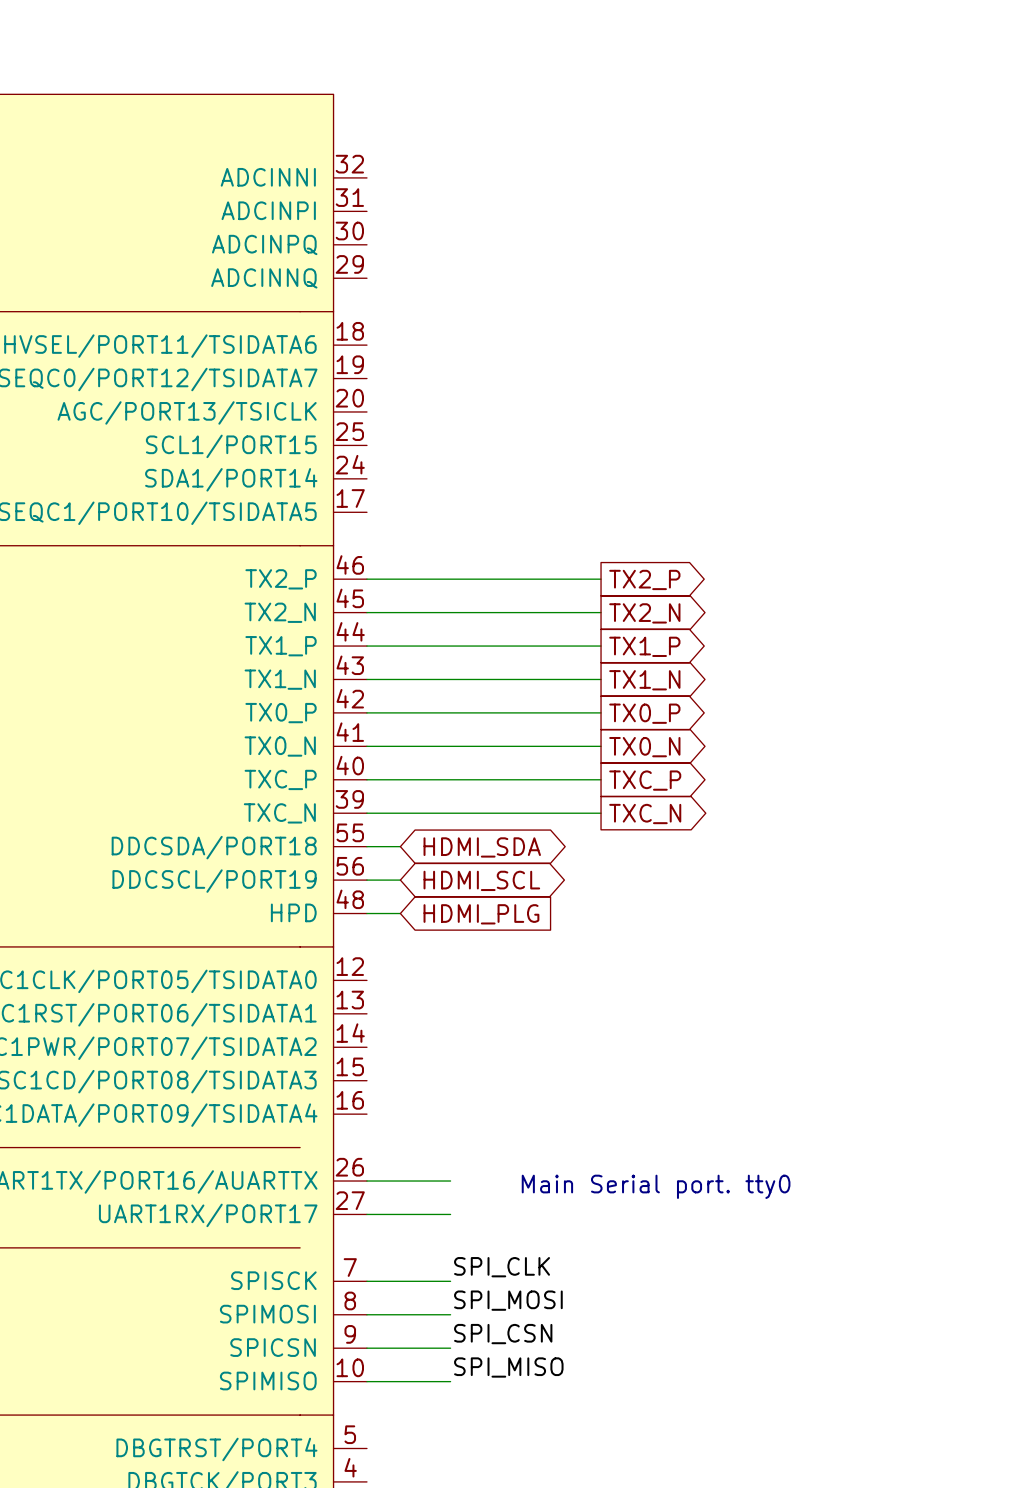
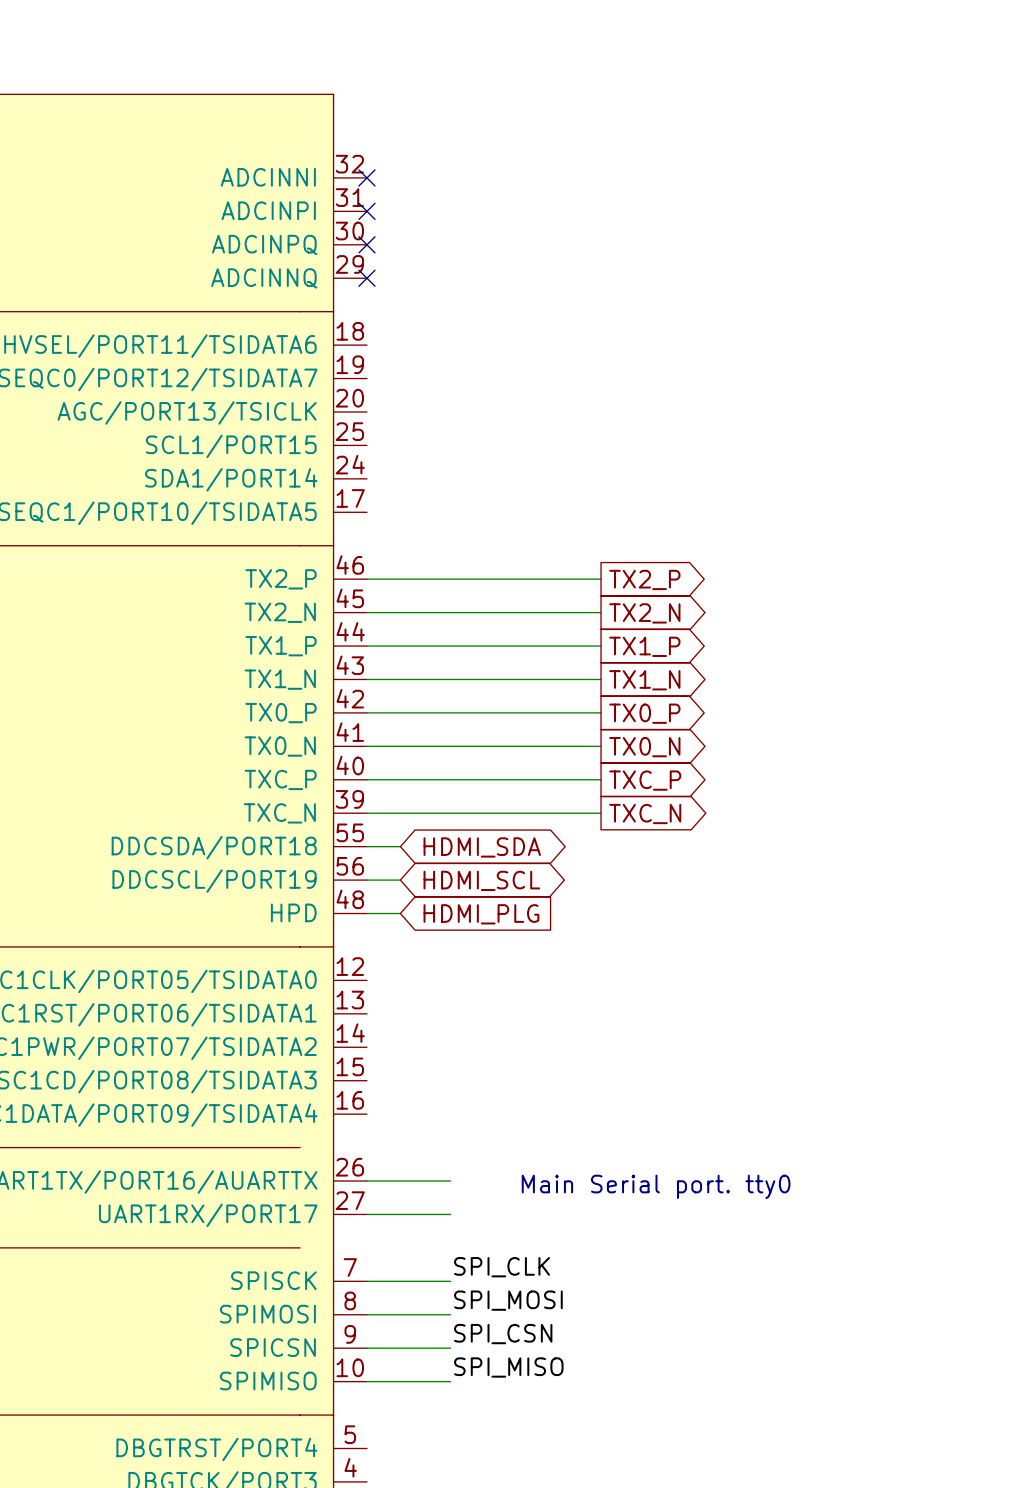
no-connect mark: none -> (366, 177)
no-connect mark: none -> (366, 211)
no-connect mark: none -> (366, 244)
no-connect mark: none -> (366, 278)

